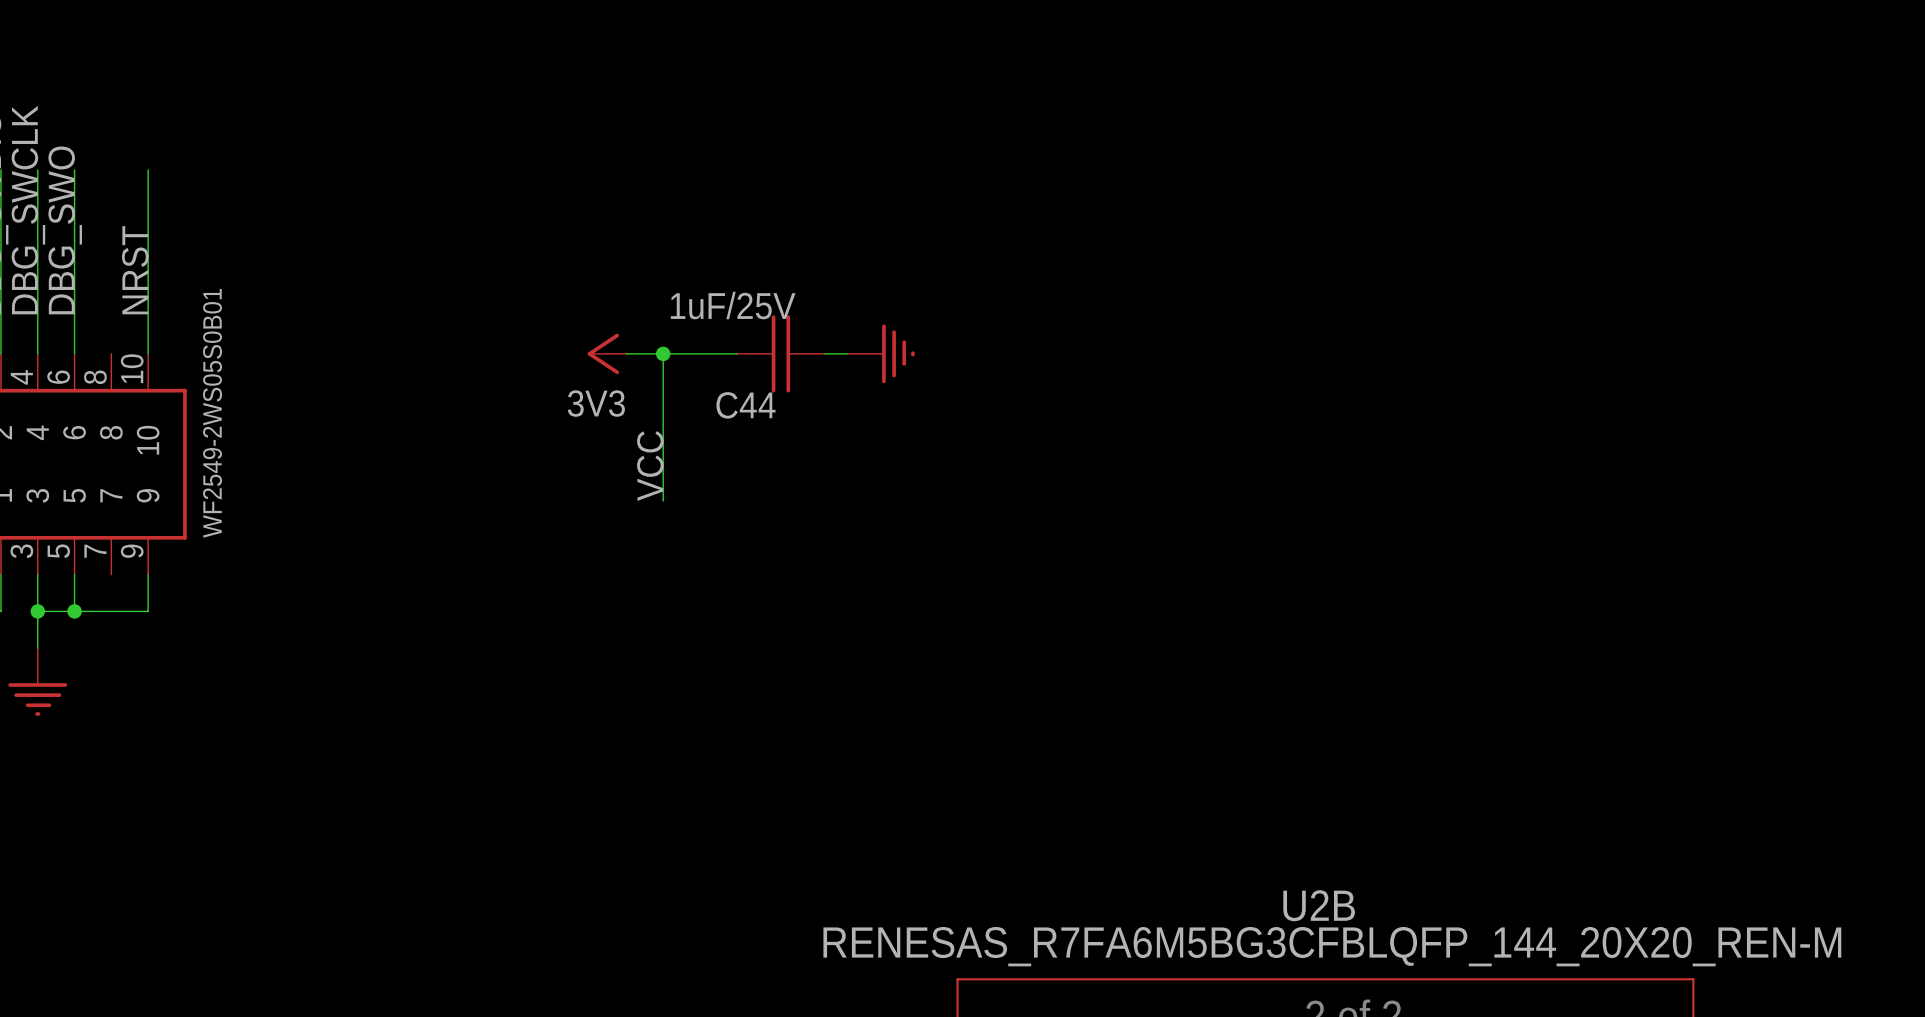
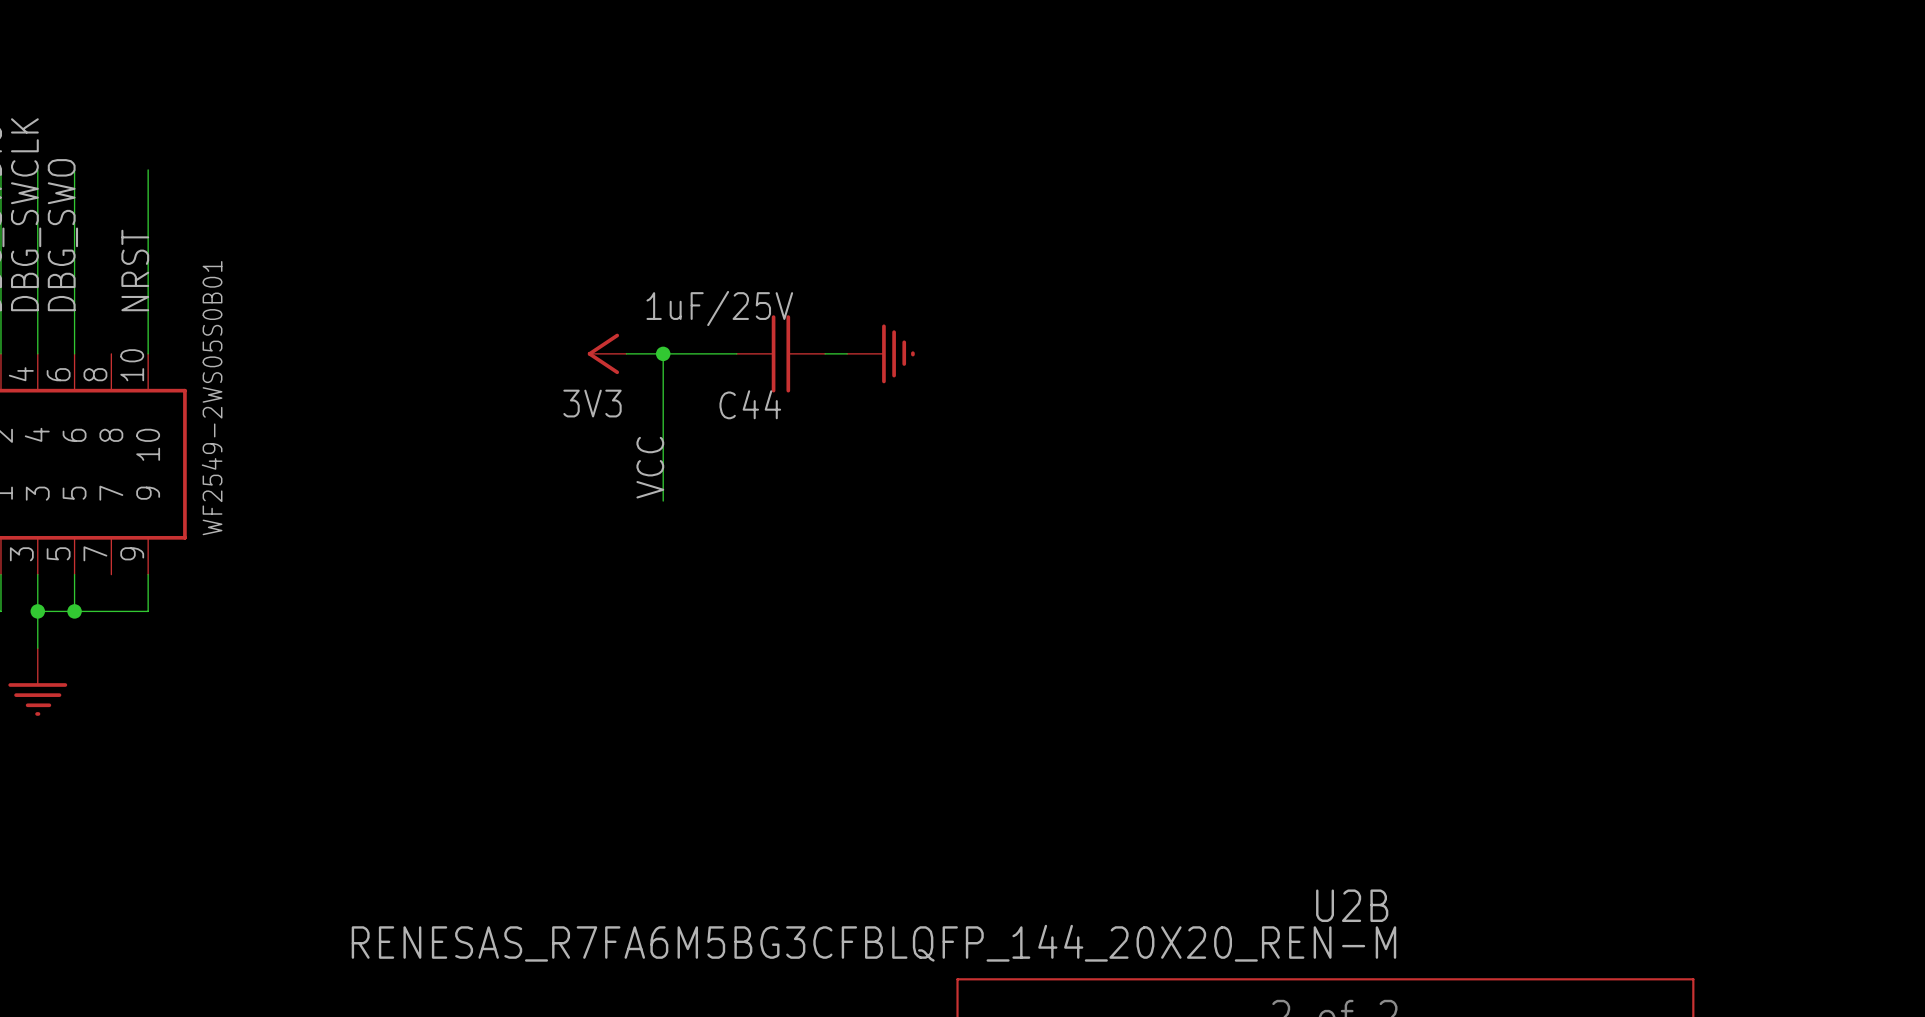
U2B name position: U2B (1319, 905) -> U2B (1352, 905)
U2B value position: RENESAS_R7FA6M5BG3CFBLQFP_144_20X20_REN-M (1332, 946) -> RENESAS_R7FA6M5BG3CFBLQFP_144_20X20_REN-M (873, 943)

